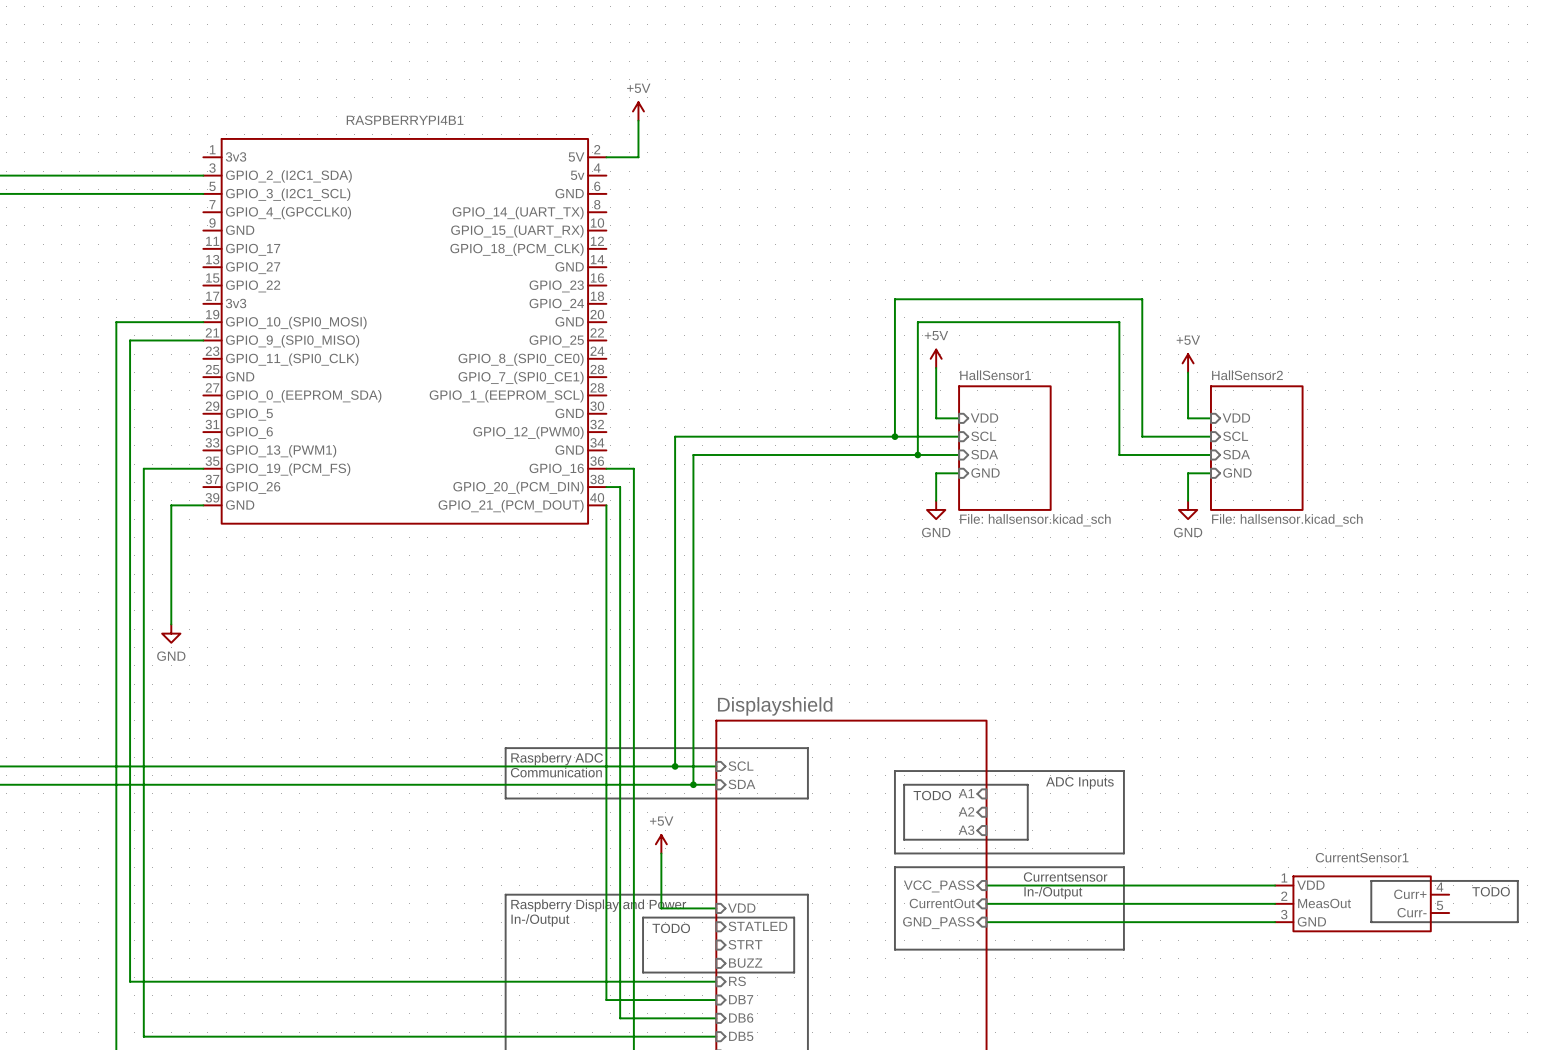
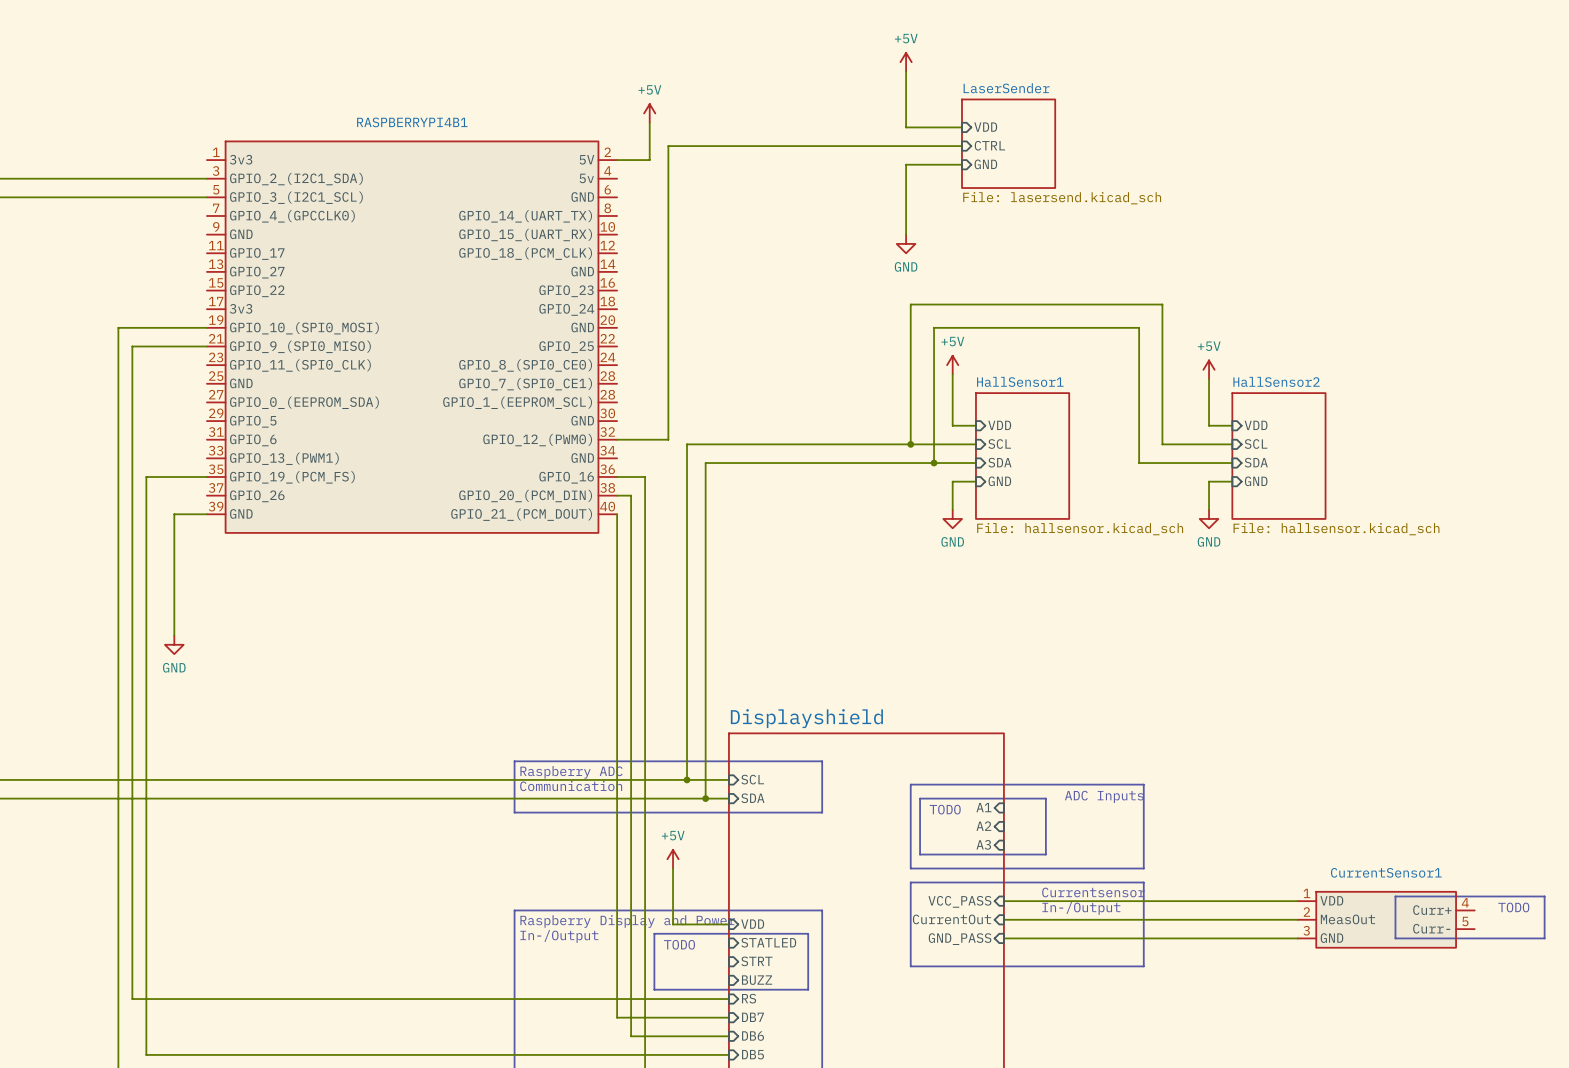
power symbol: none -> +5V (906, 62)
wire: none -> (906, 71) (906, 127) (962, 127)
sheet pin: none -> VDD (985, 127)
sheet LaserSender: none -> File: lasersend.kicad_sch (1008, 143)
wire: none -> (962, 146) (668, 146) (668, 439) (617, 439)
sheet pin: none -> CTRL (989, 145)
wire: none -> (962, 164) (906, 164) (906, 234)
sheet pin: none -> GND (985, 164)
power symbol: none -> GND (906, 243)

